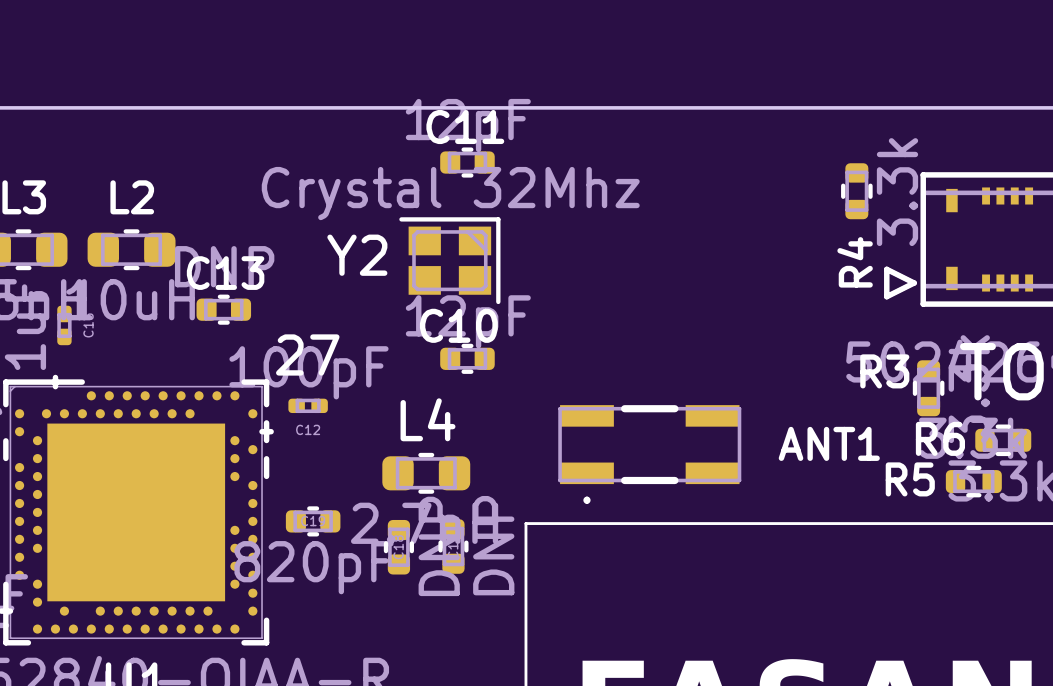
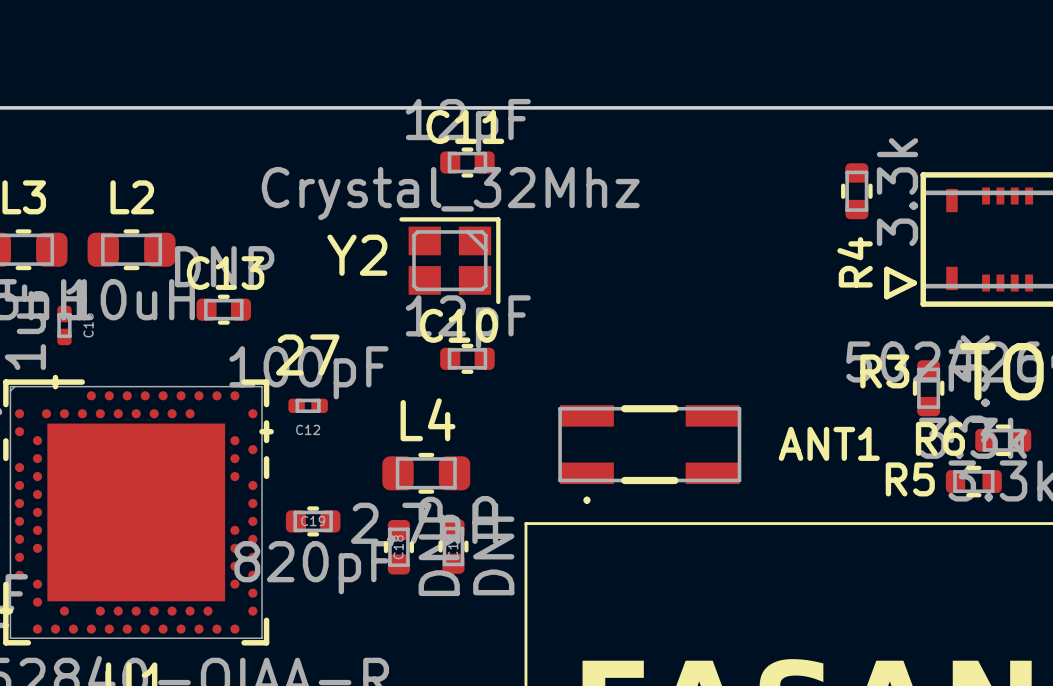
Y2 value: Crystal 32Mhz (450, 193) -> Crystal_32Mhz (450, 193)

